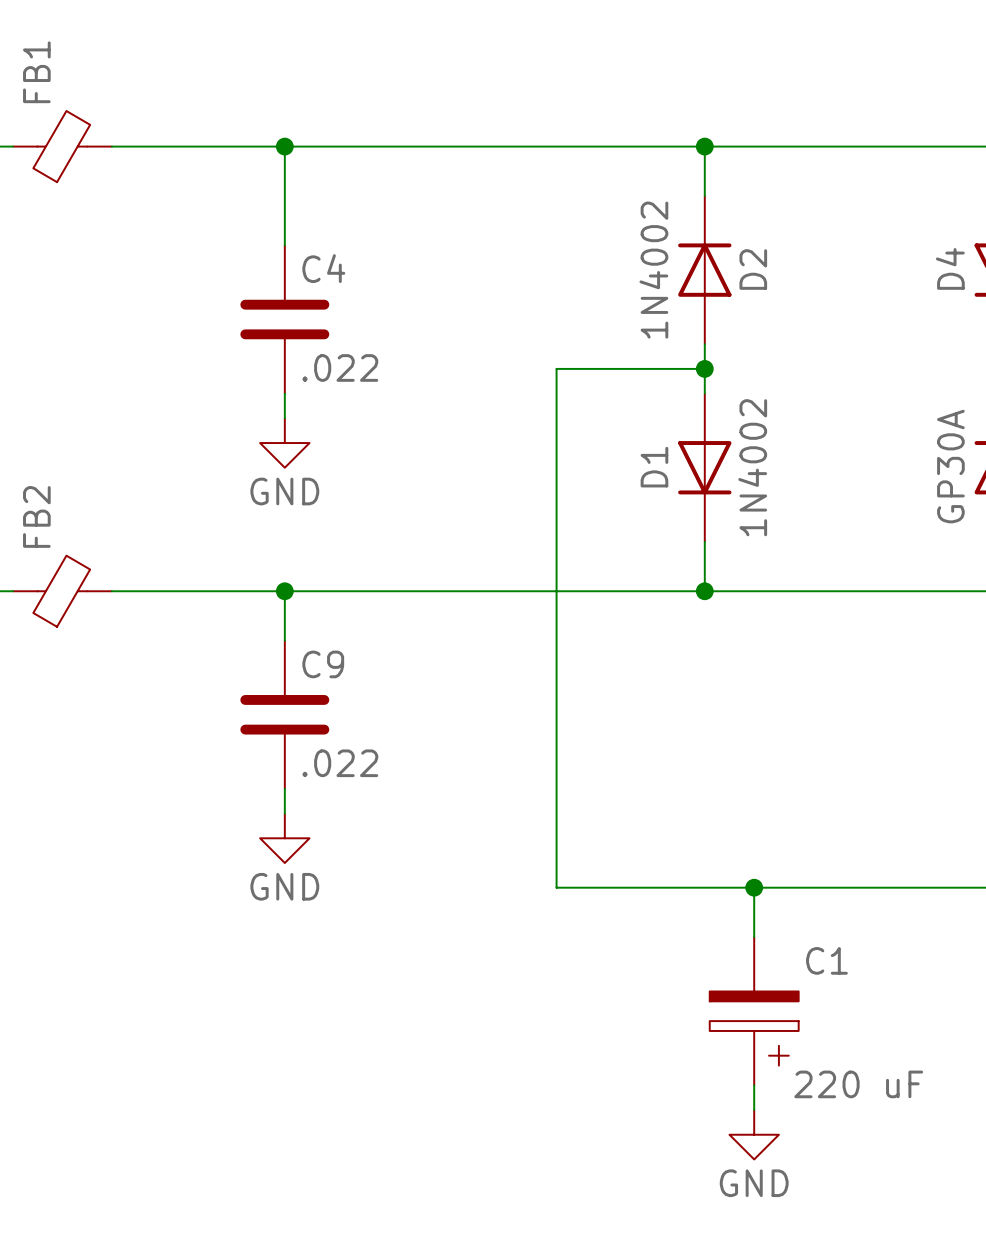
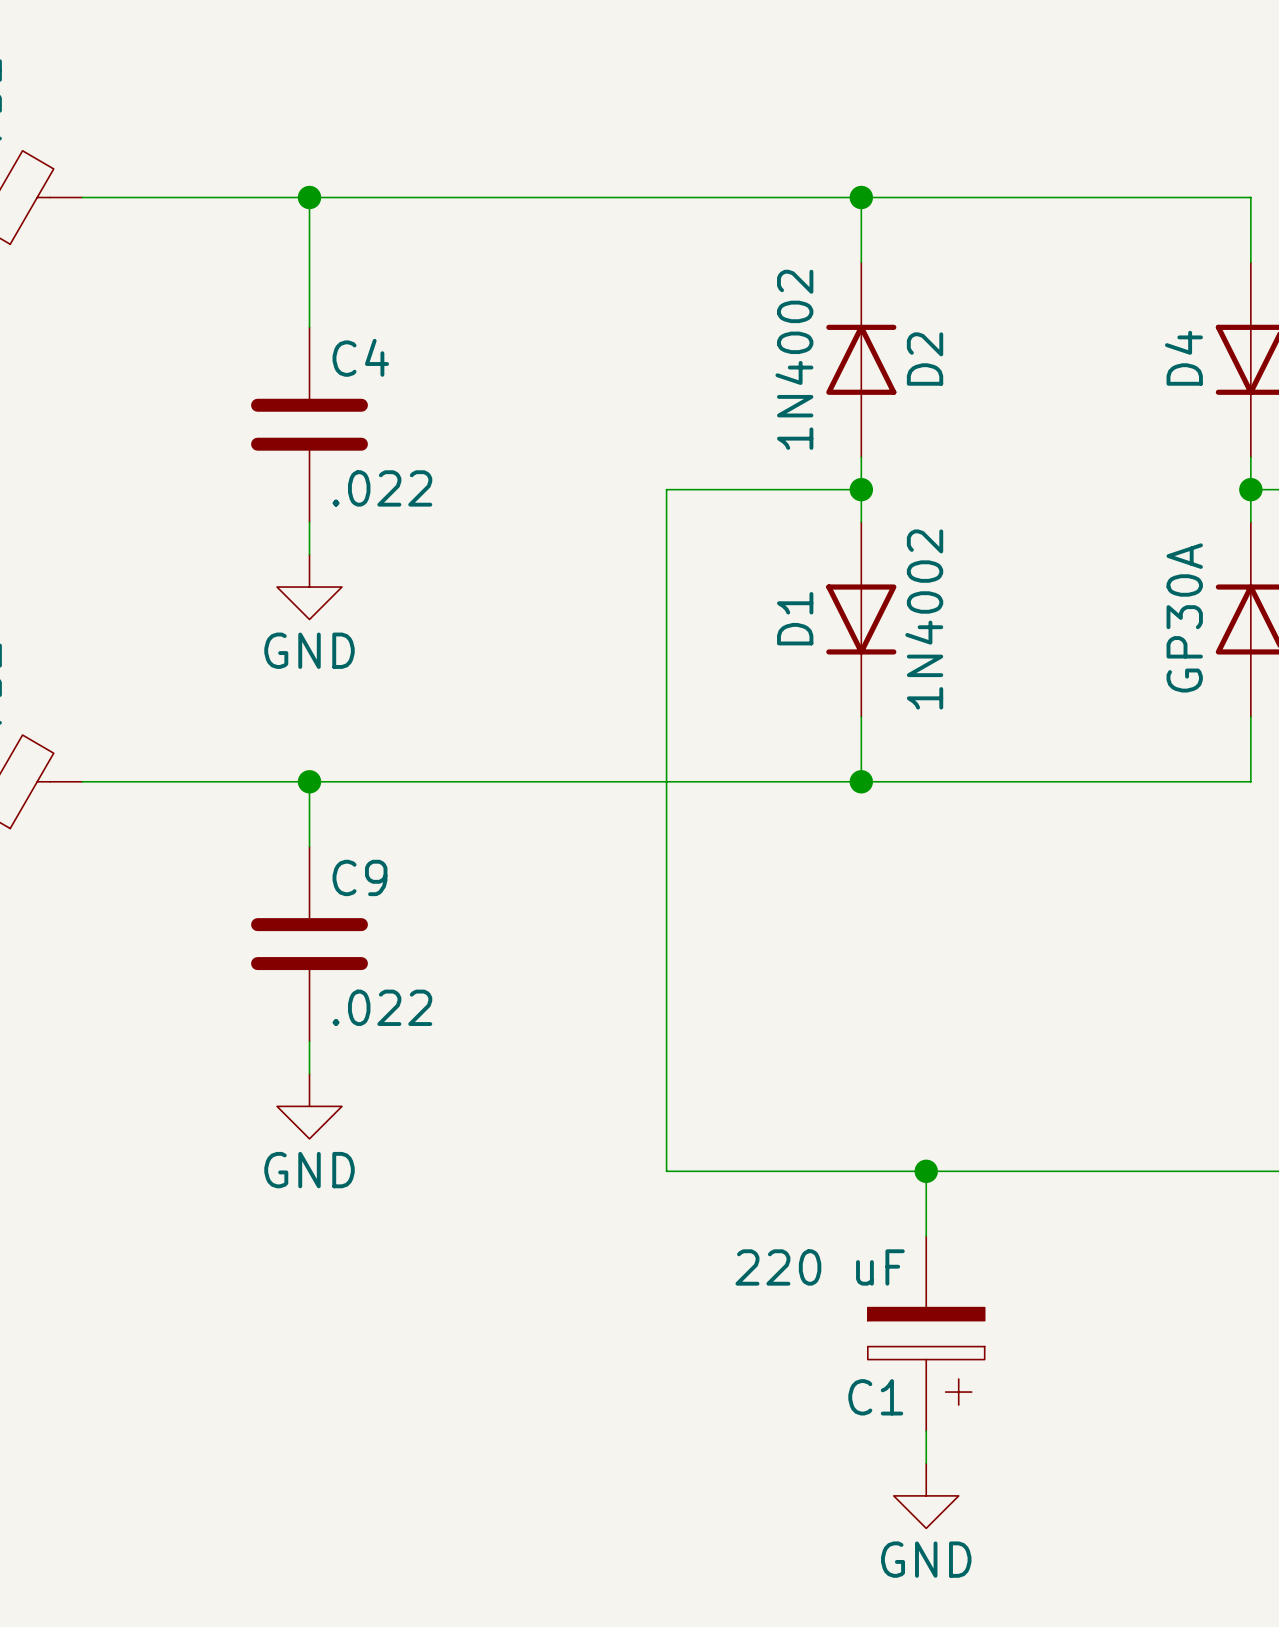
C1 name position: C1 (826, 960) -> C1 (875, 1397)
C1 value position: 220 uF (858, 1084) -> 220 uF (820, 1267)

